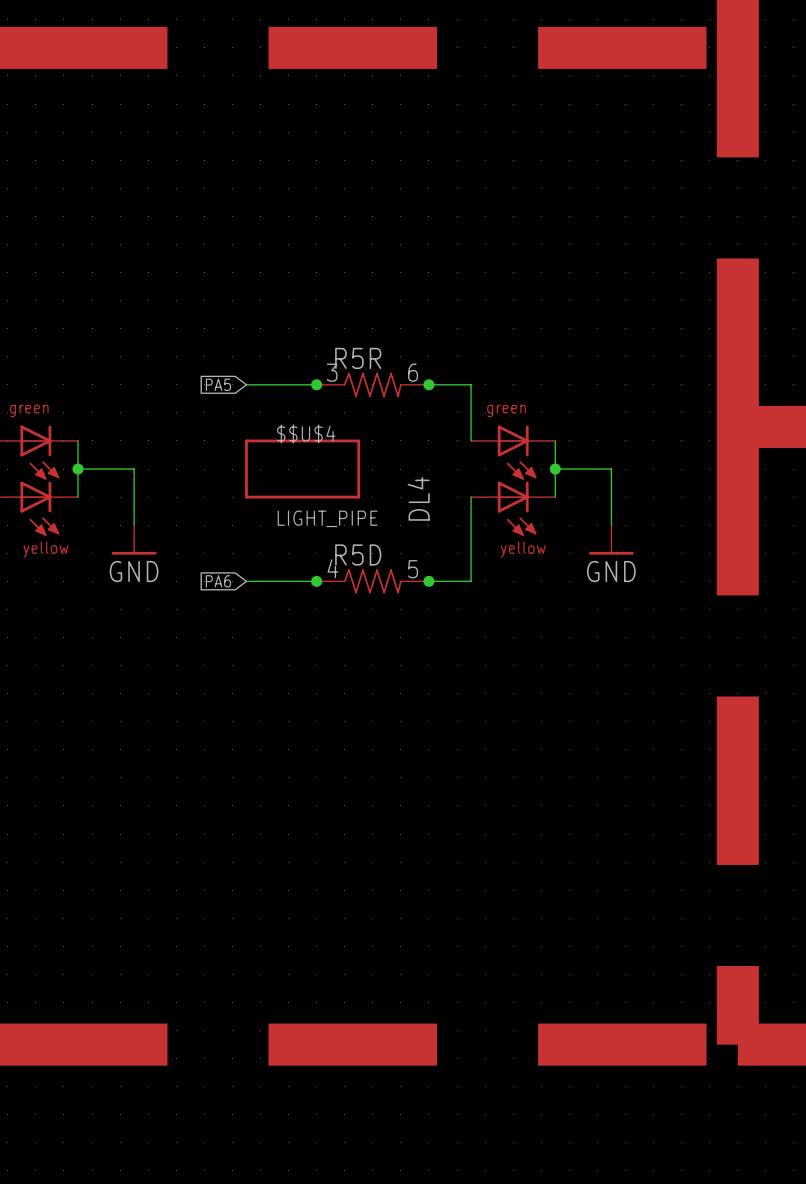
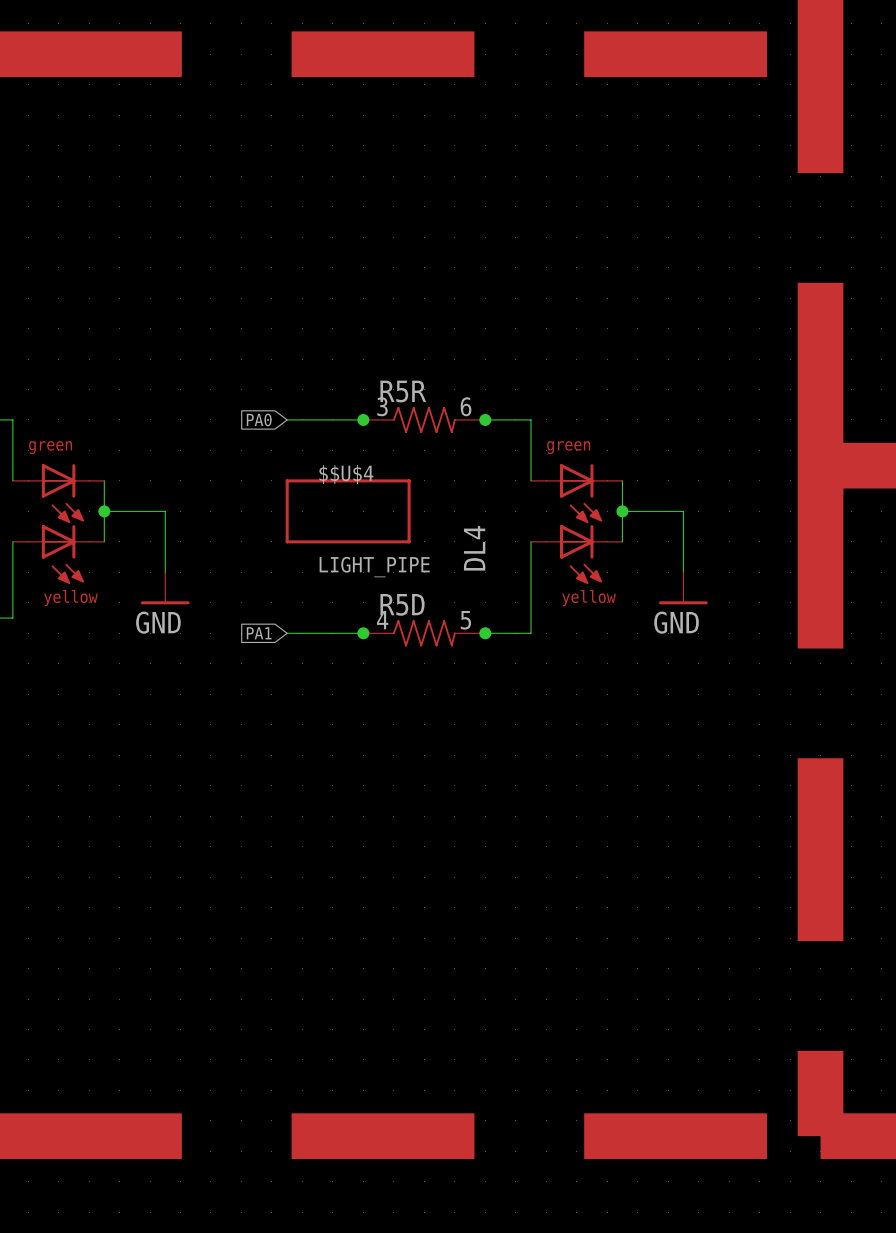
global label: PA5 (218, 384) -> PA0 (259, 419)
global label: PA6 (218, 581) -> PA1 (259, 633)

